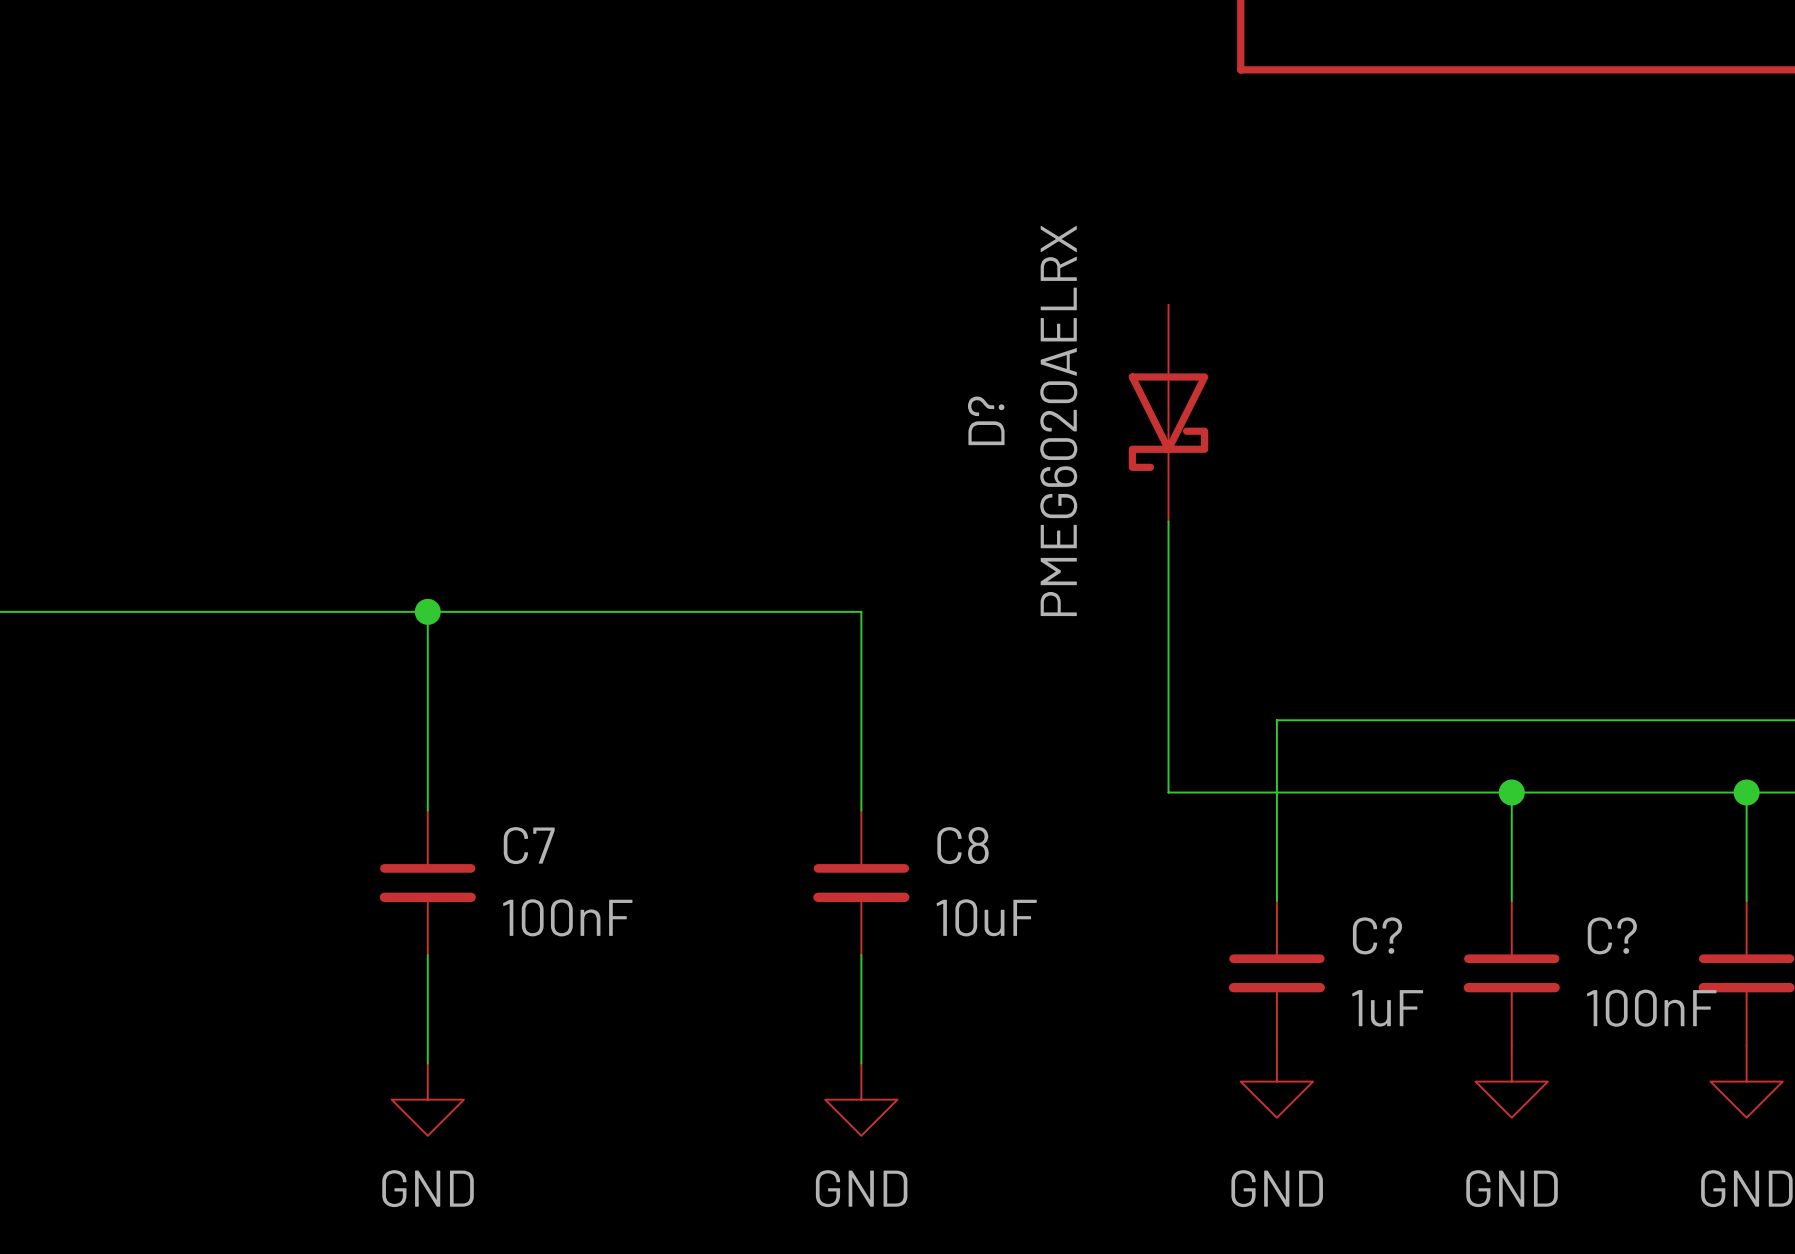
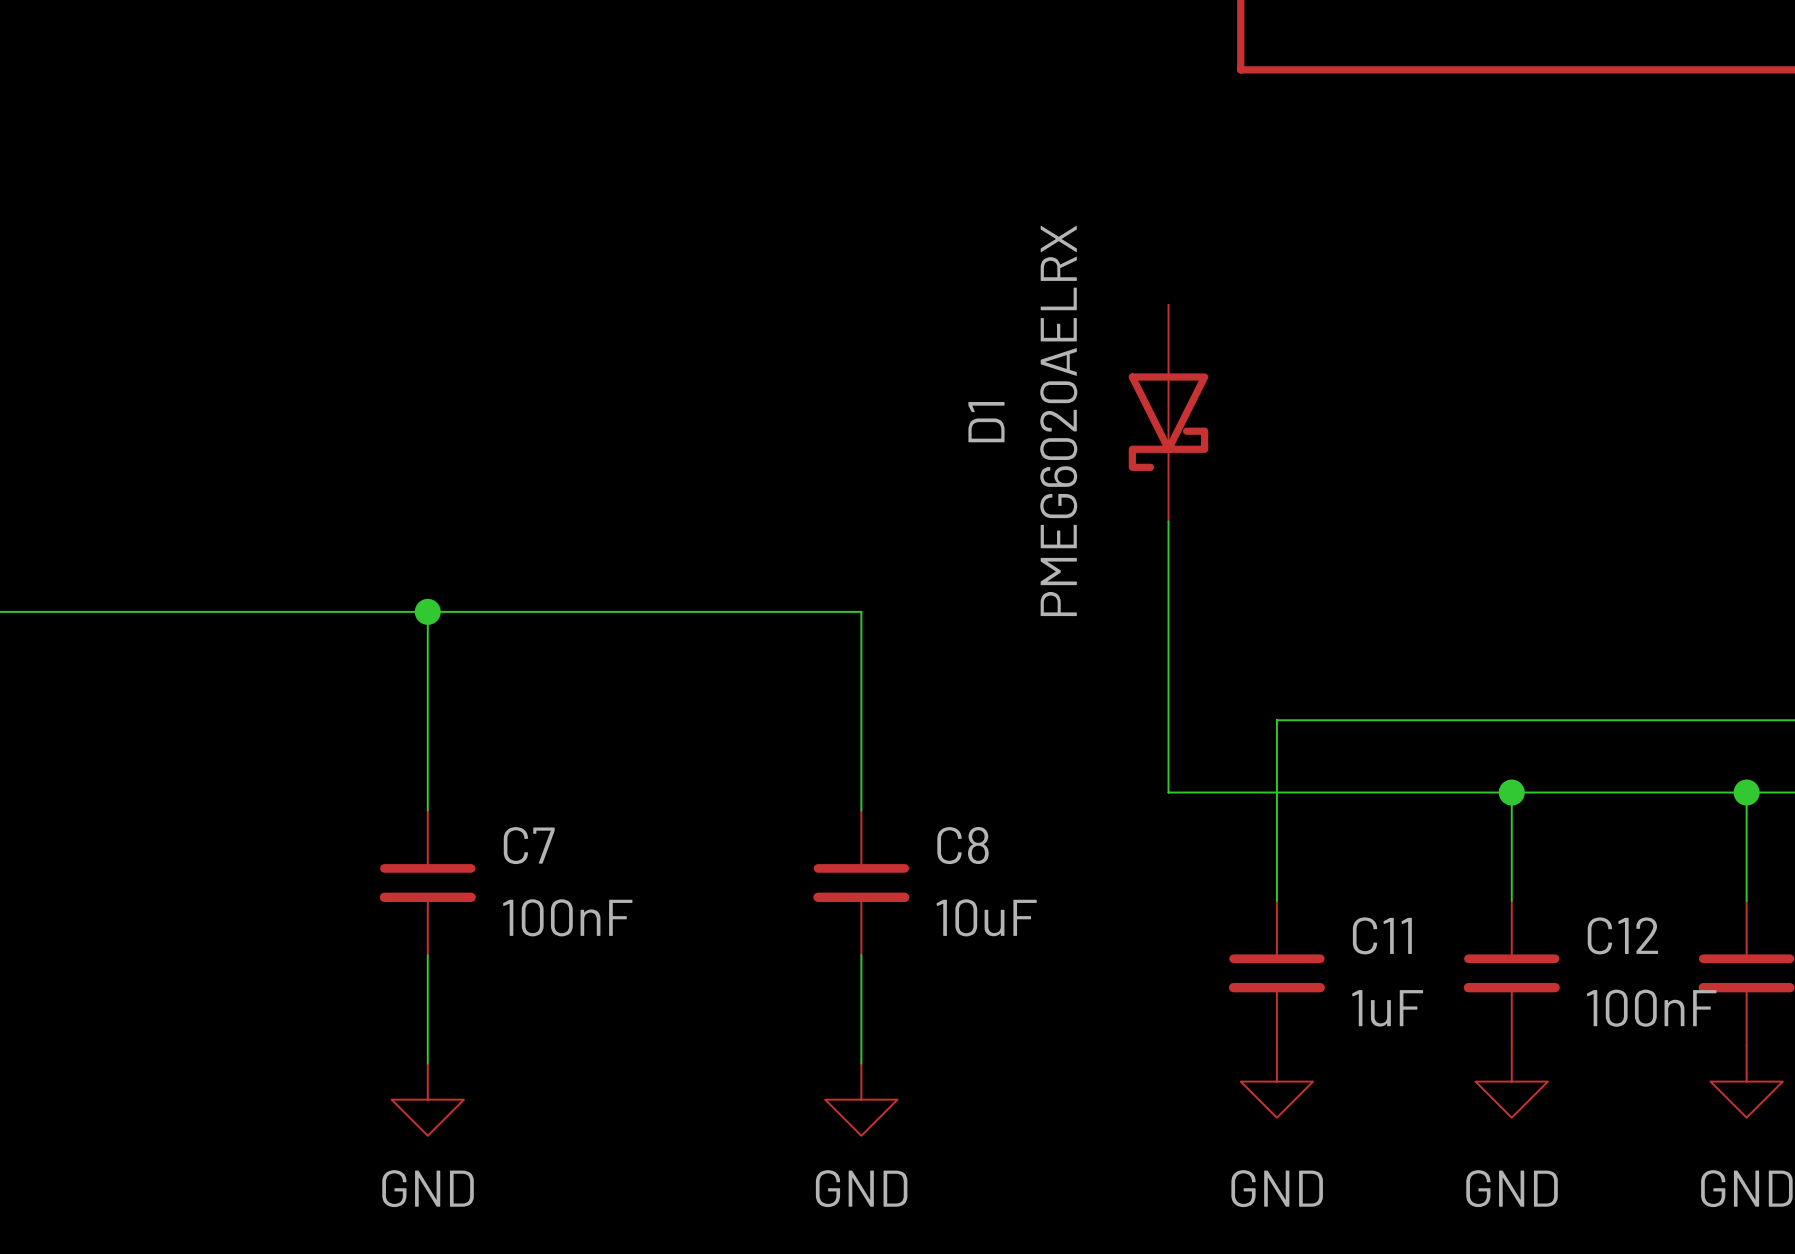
D? name: D? (986, 420) -> D1 (986, 422)
C? name: C? (1377, 935) -> C11 (1382, 935)
C? name: C? (1612, 935) -> C12 (1622, 935)

